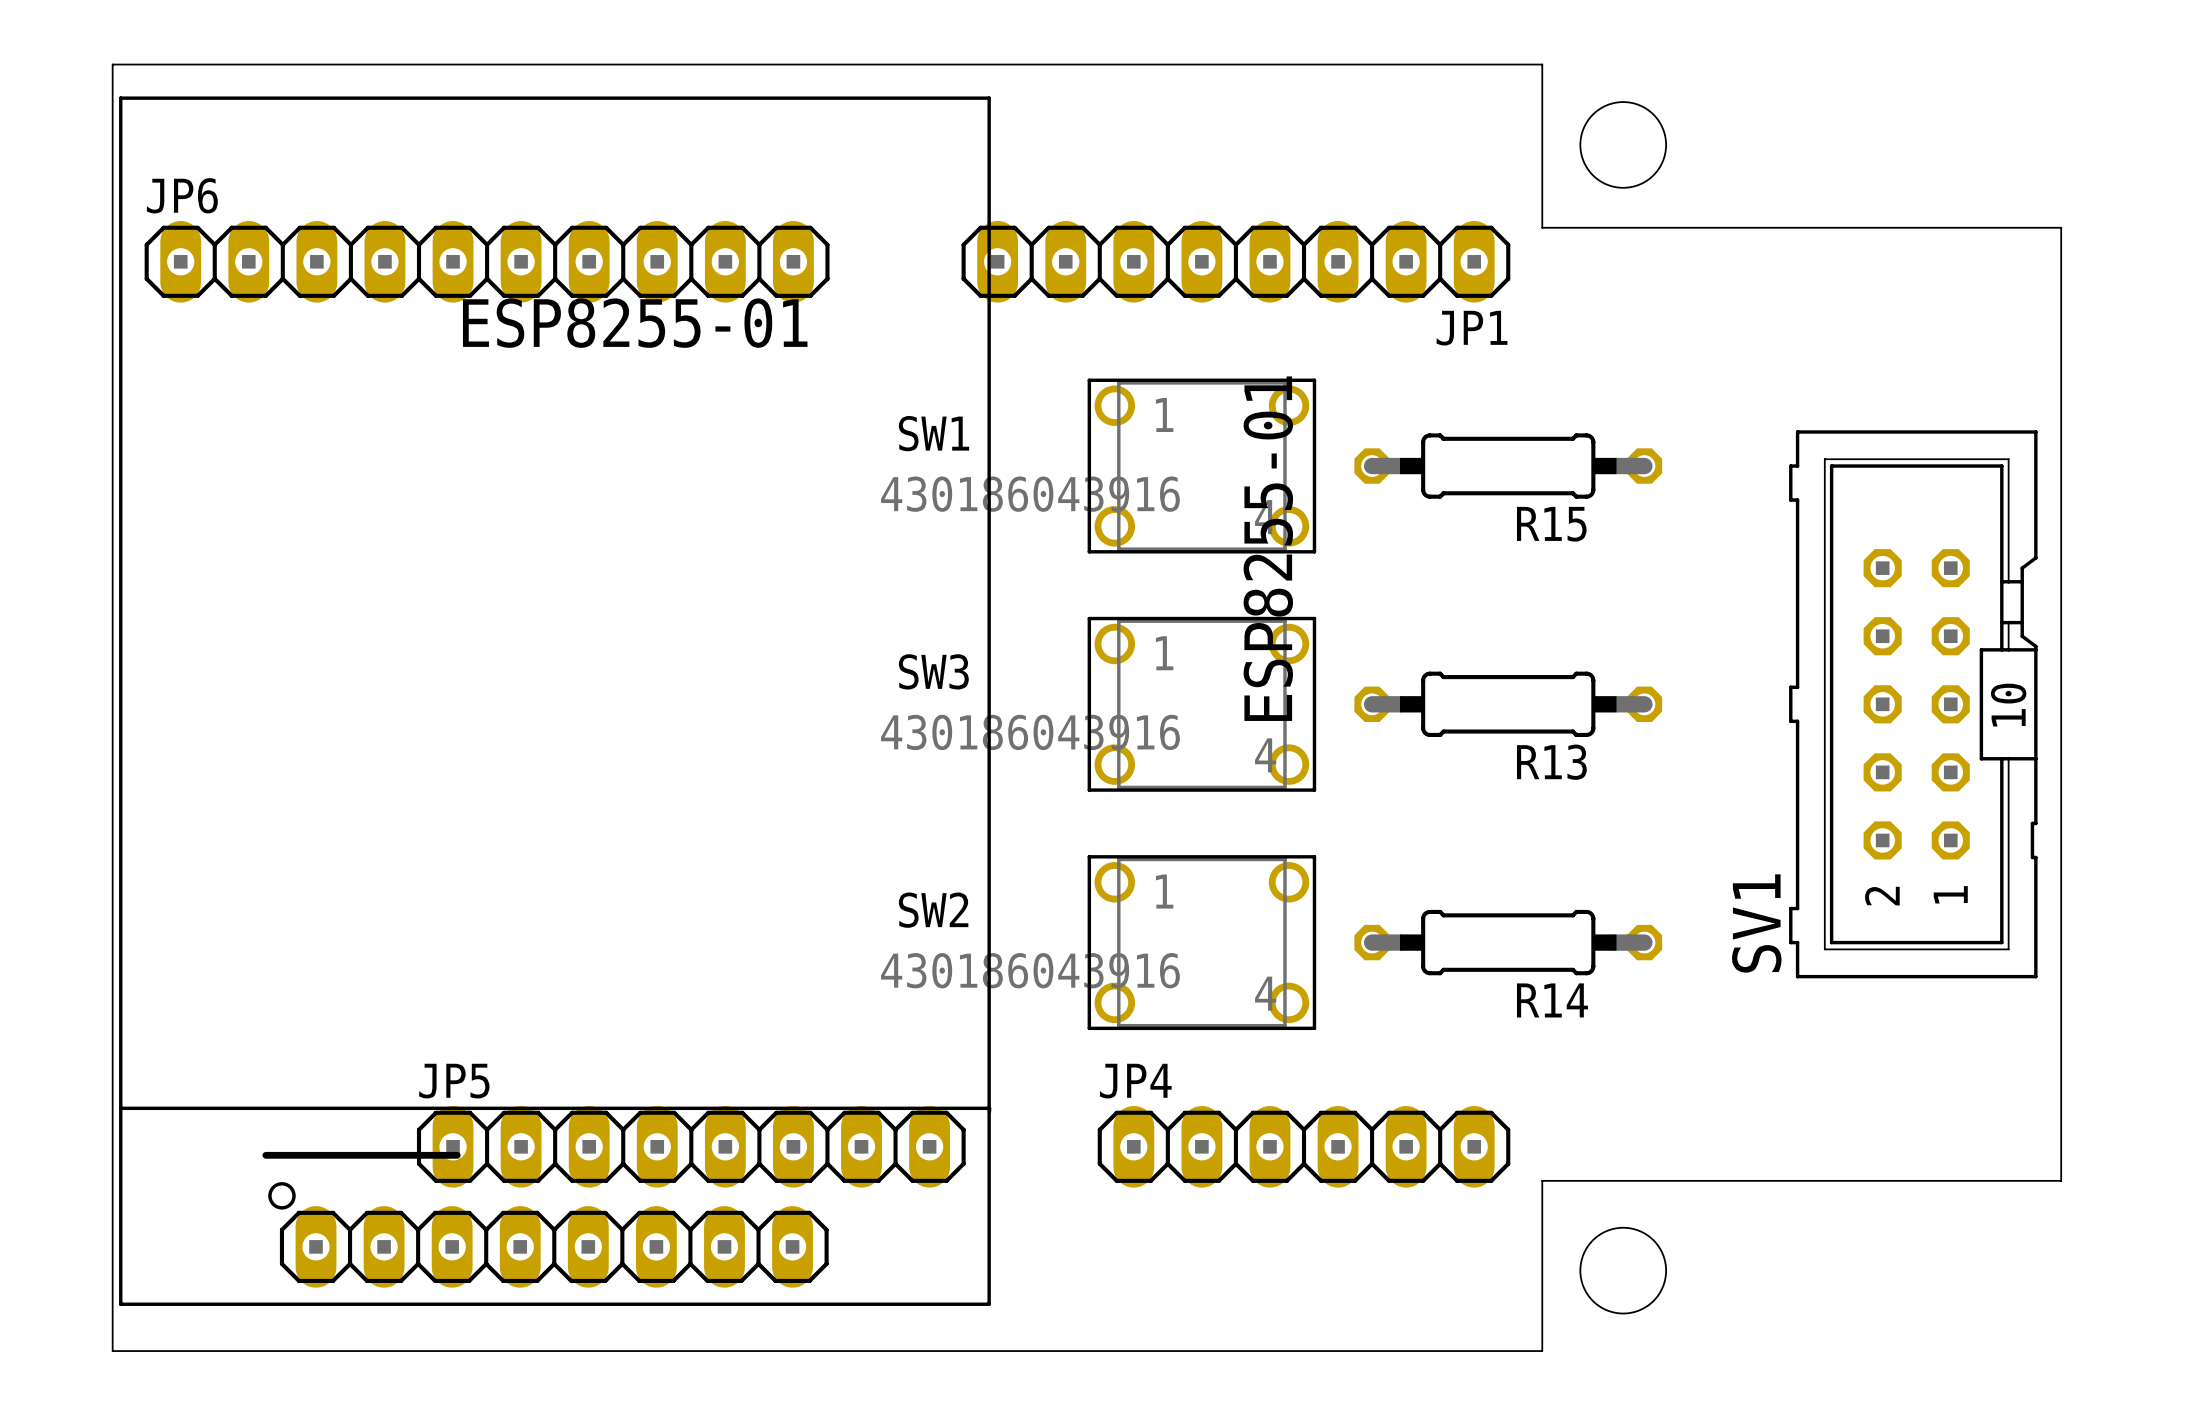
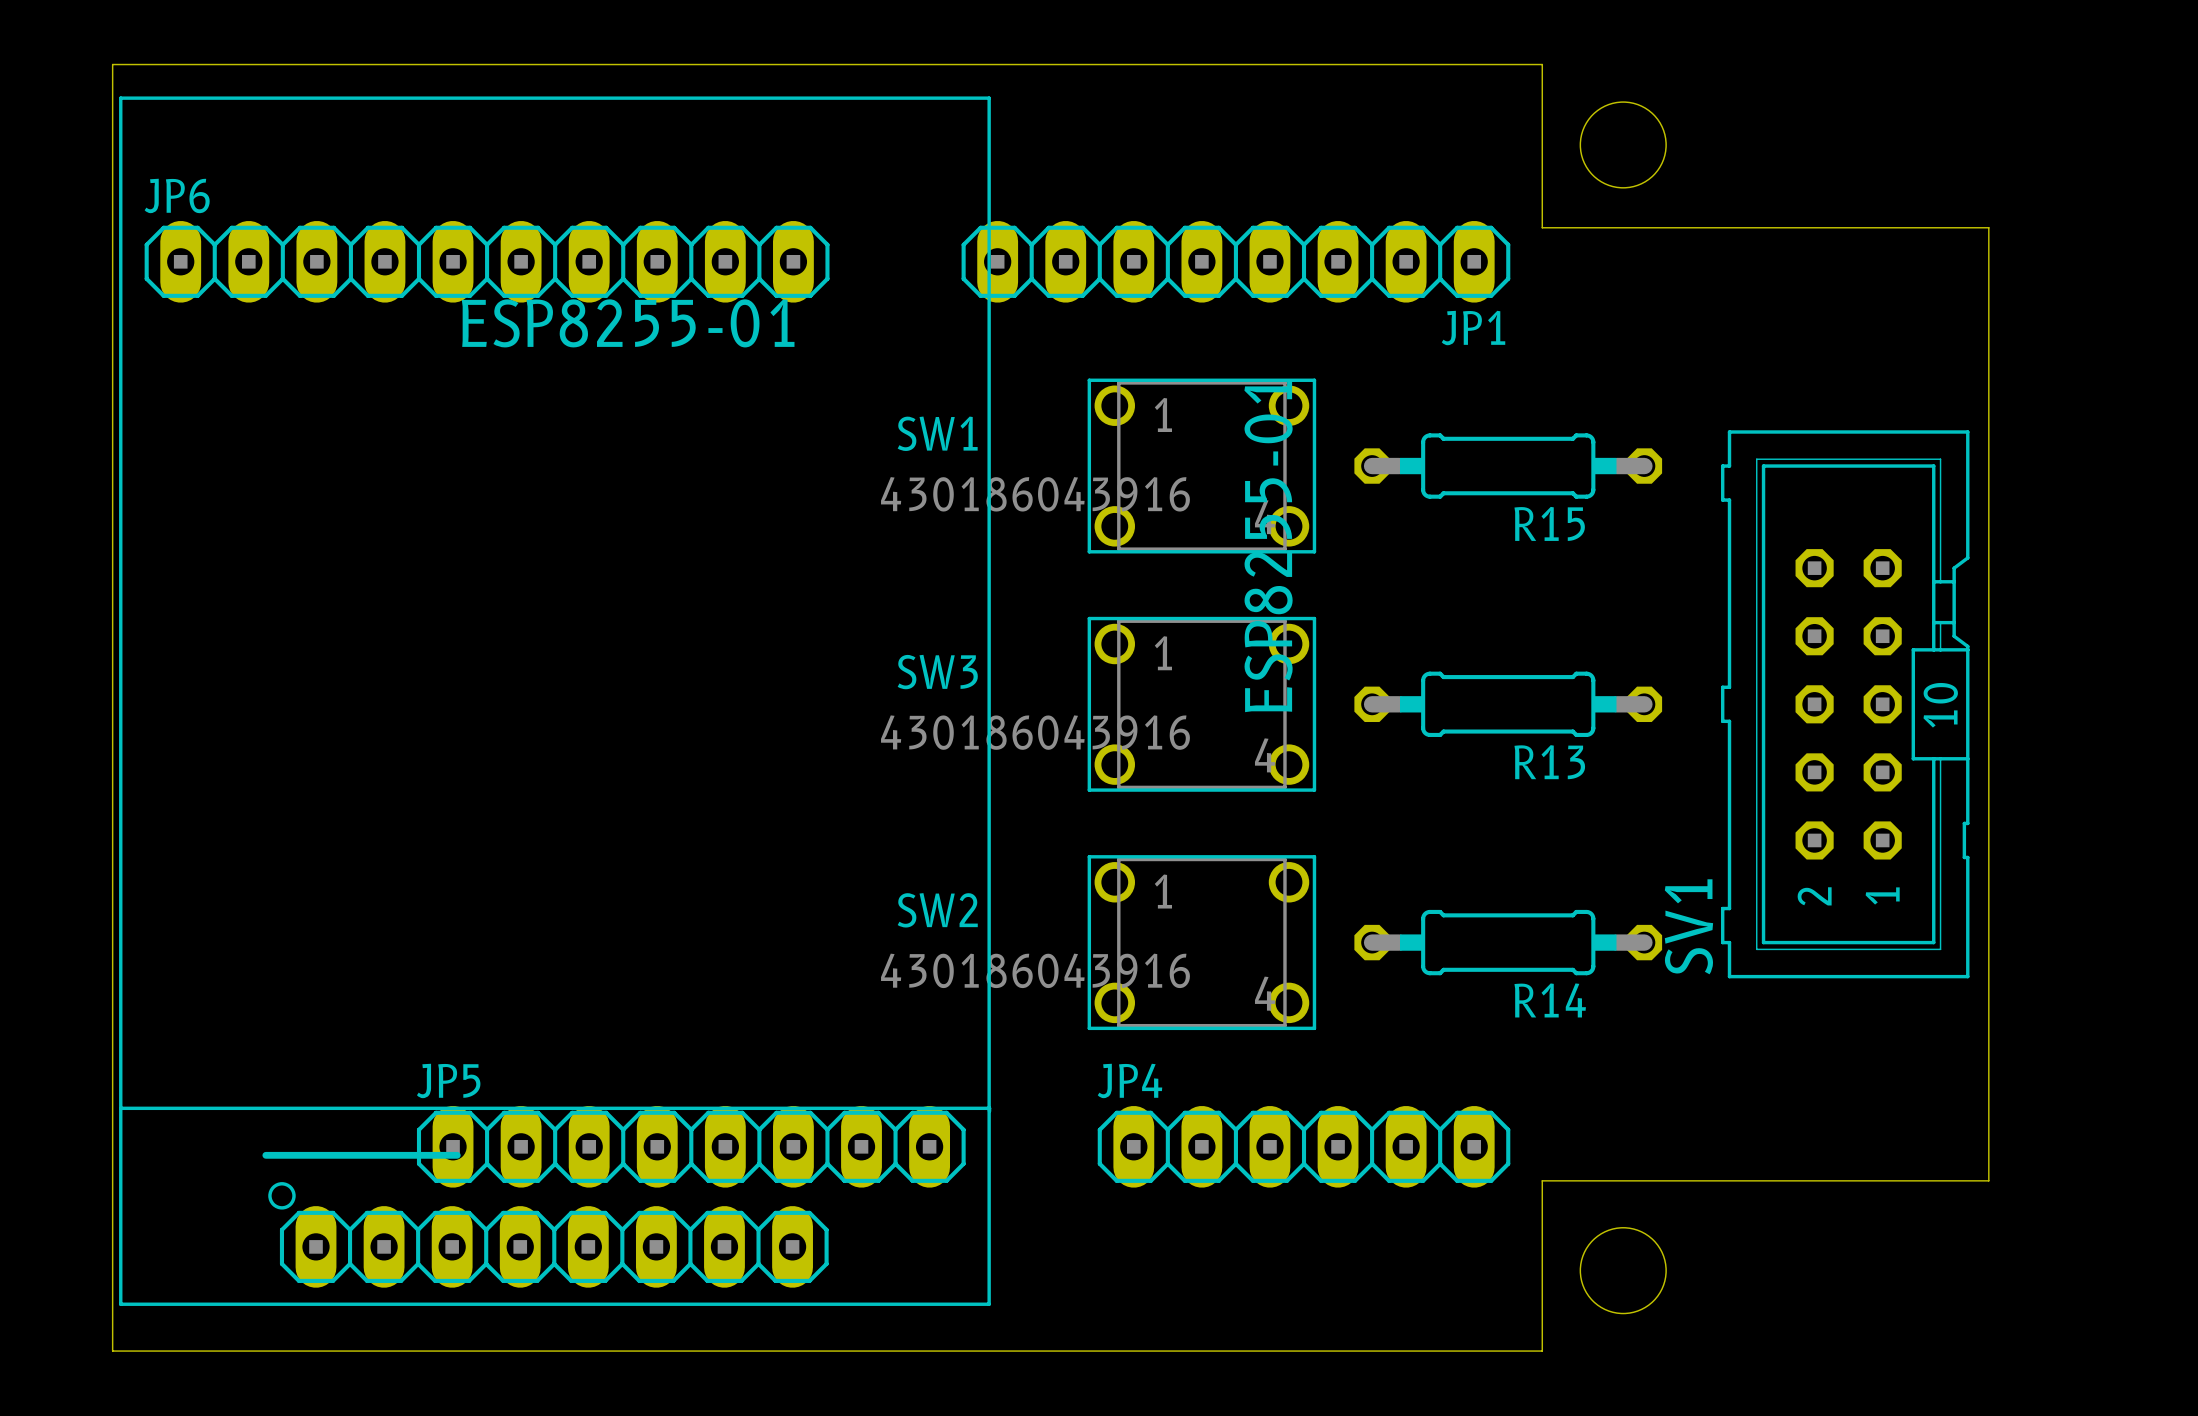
board edge: (1988, 227) (2061, 227) (2061, 1180) (1988, 1180) -> (1988, 227) (1988, 1180)
SV1 position: (1913, 704) -> (1845, 704)

